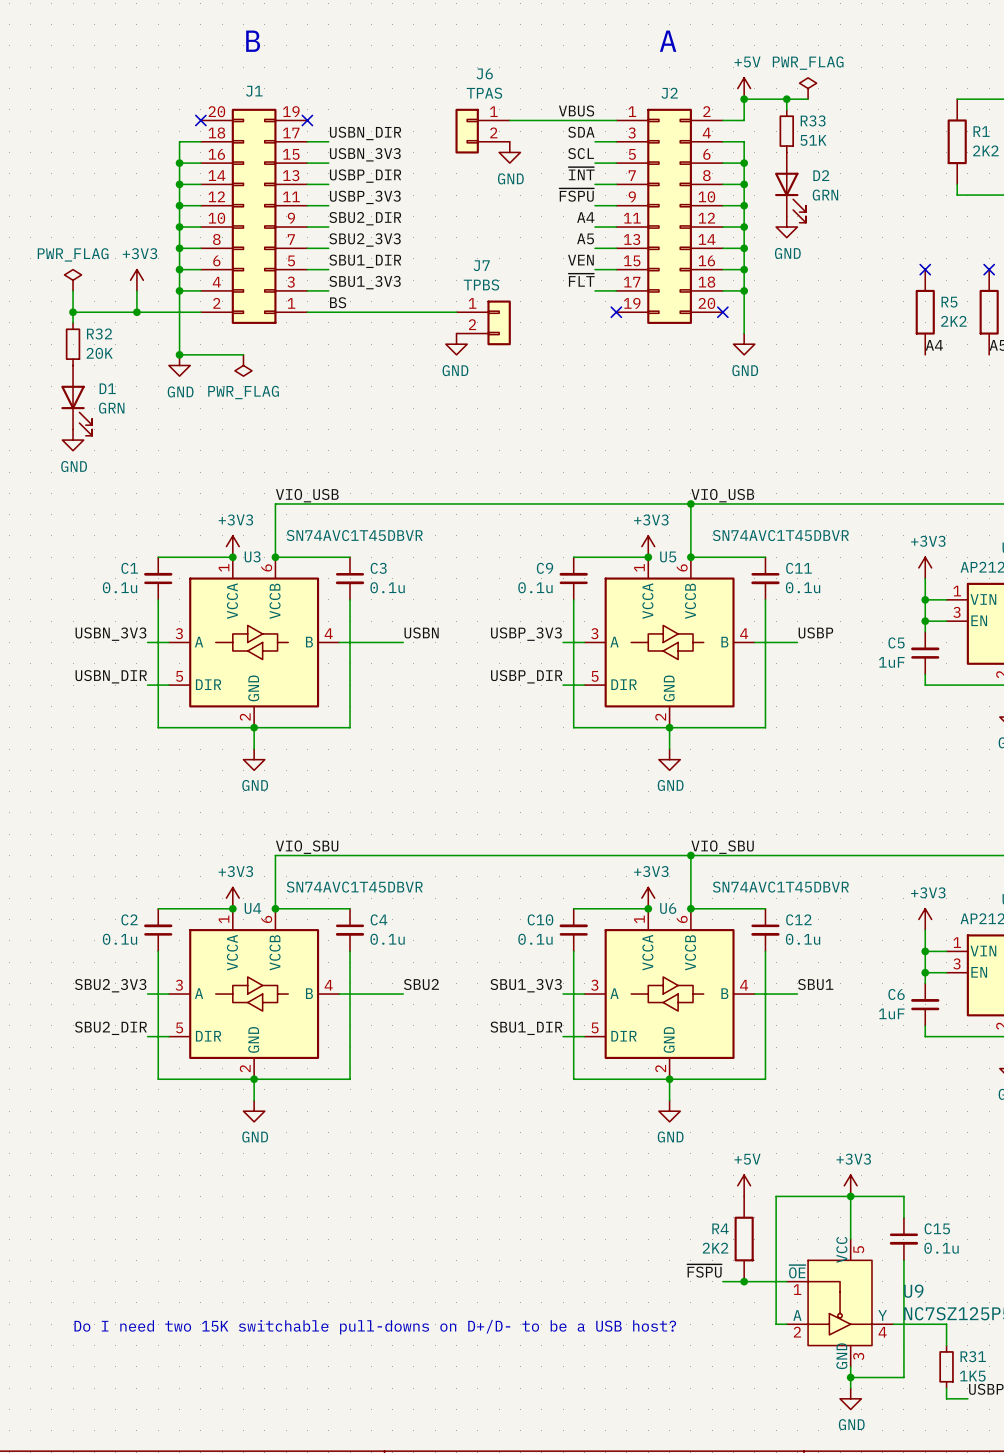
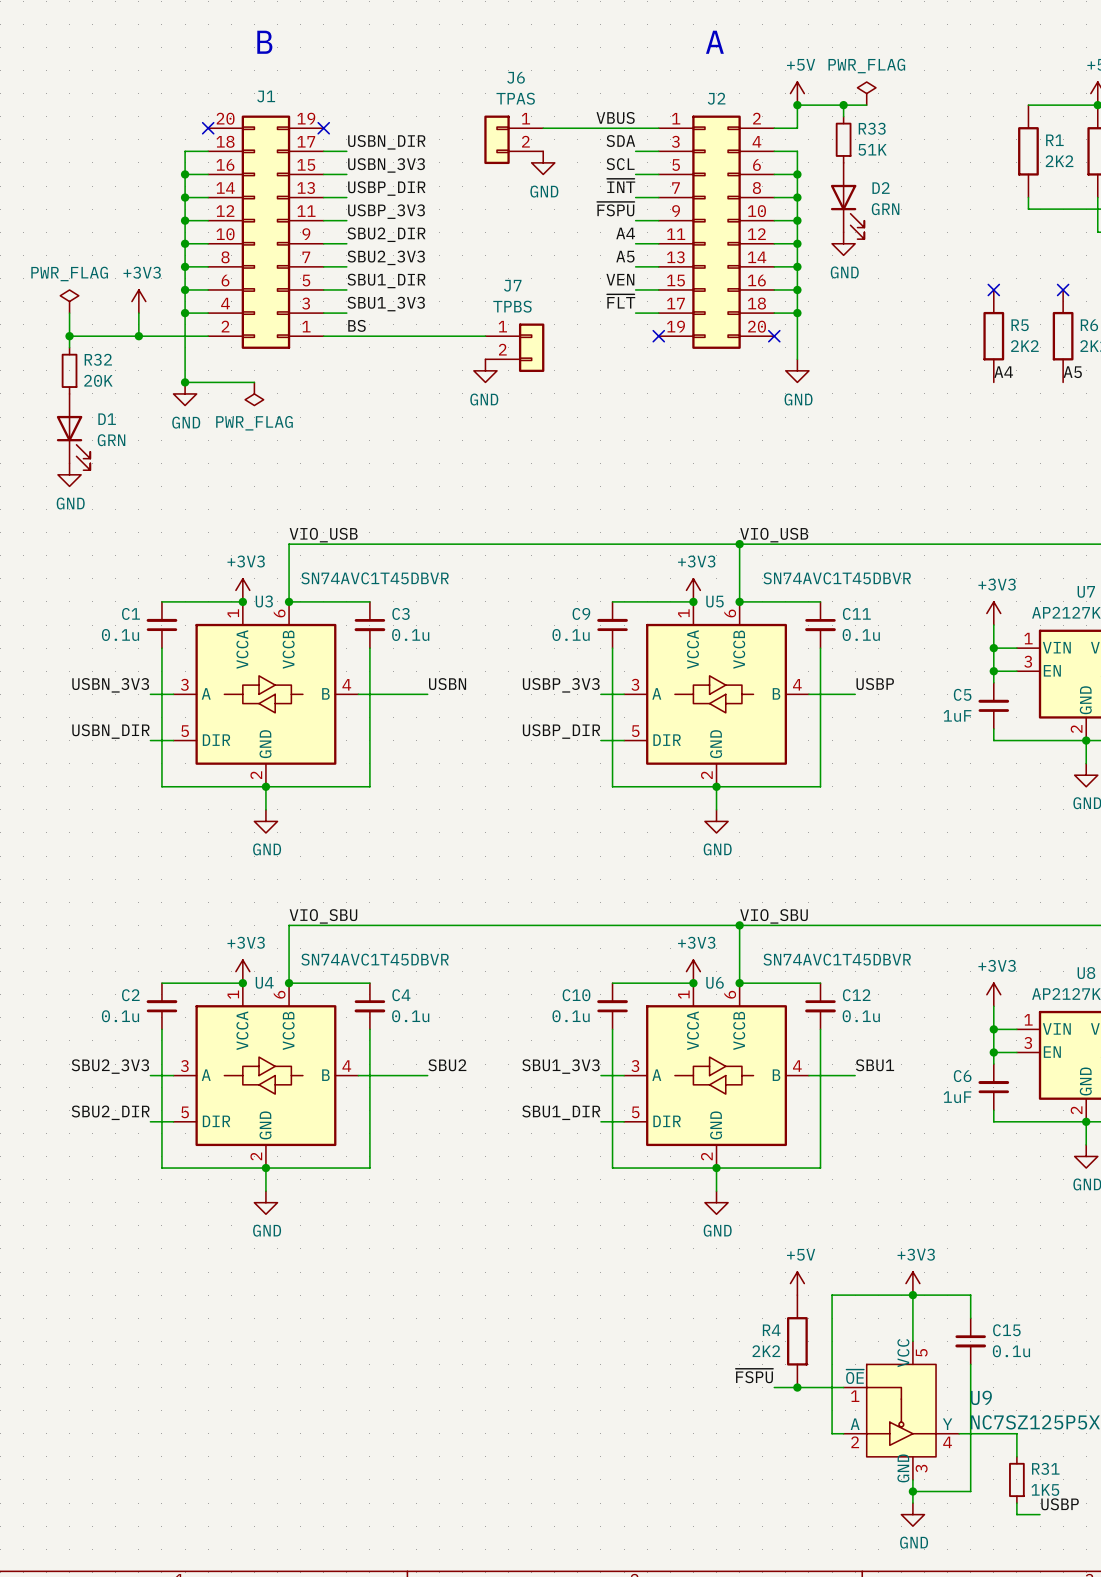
text: Do I need two 15K switchable pull-downs on D+/D- to be a USB host? (375, 1327) -> none

